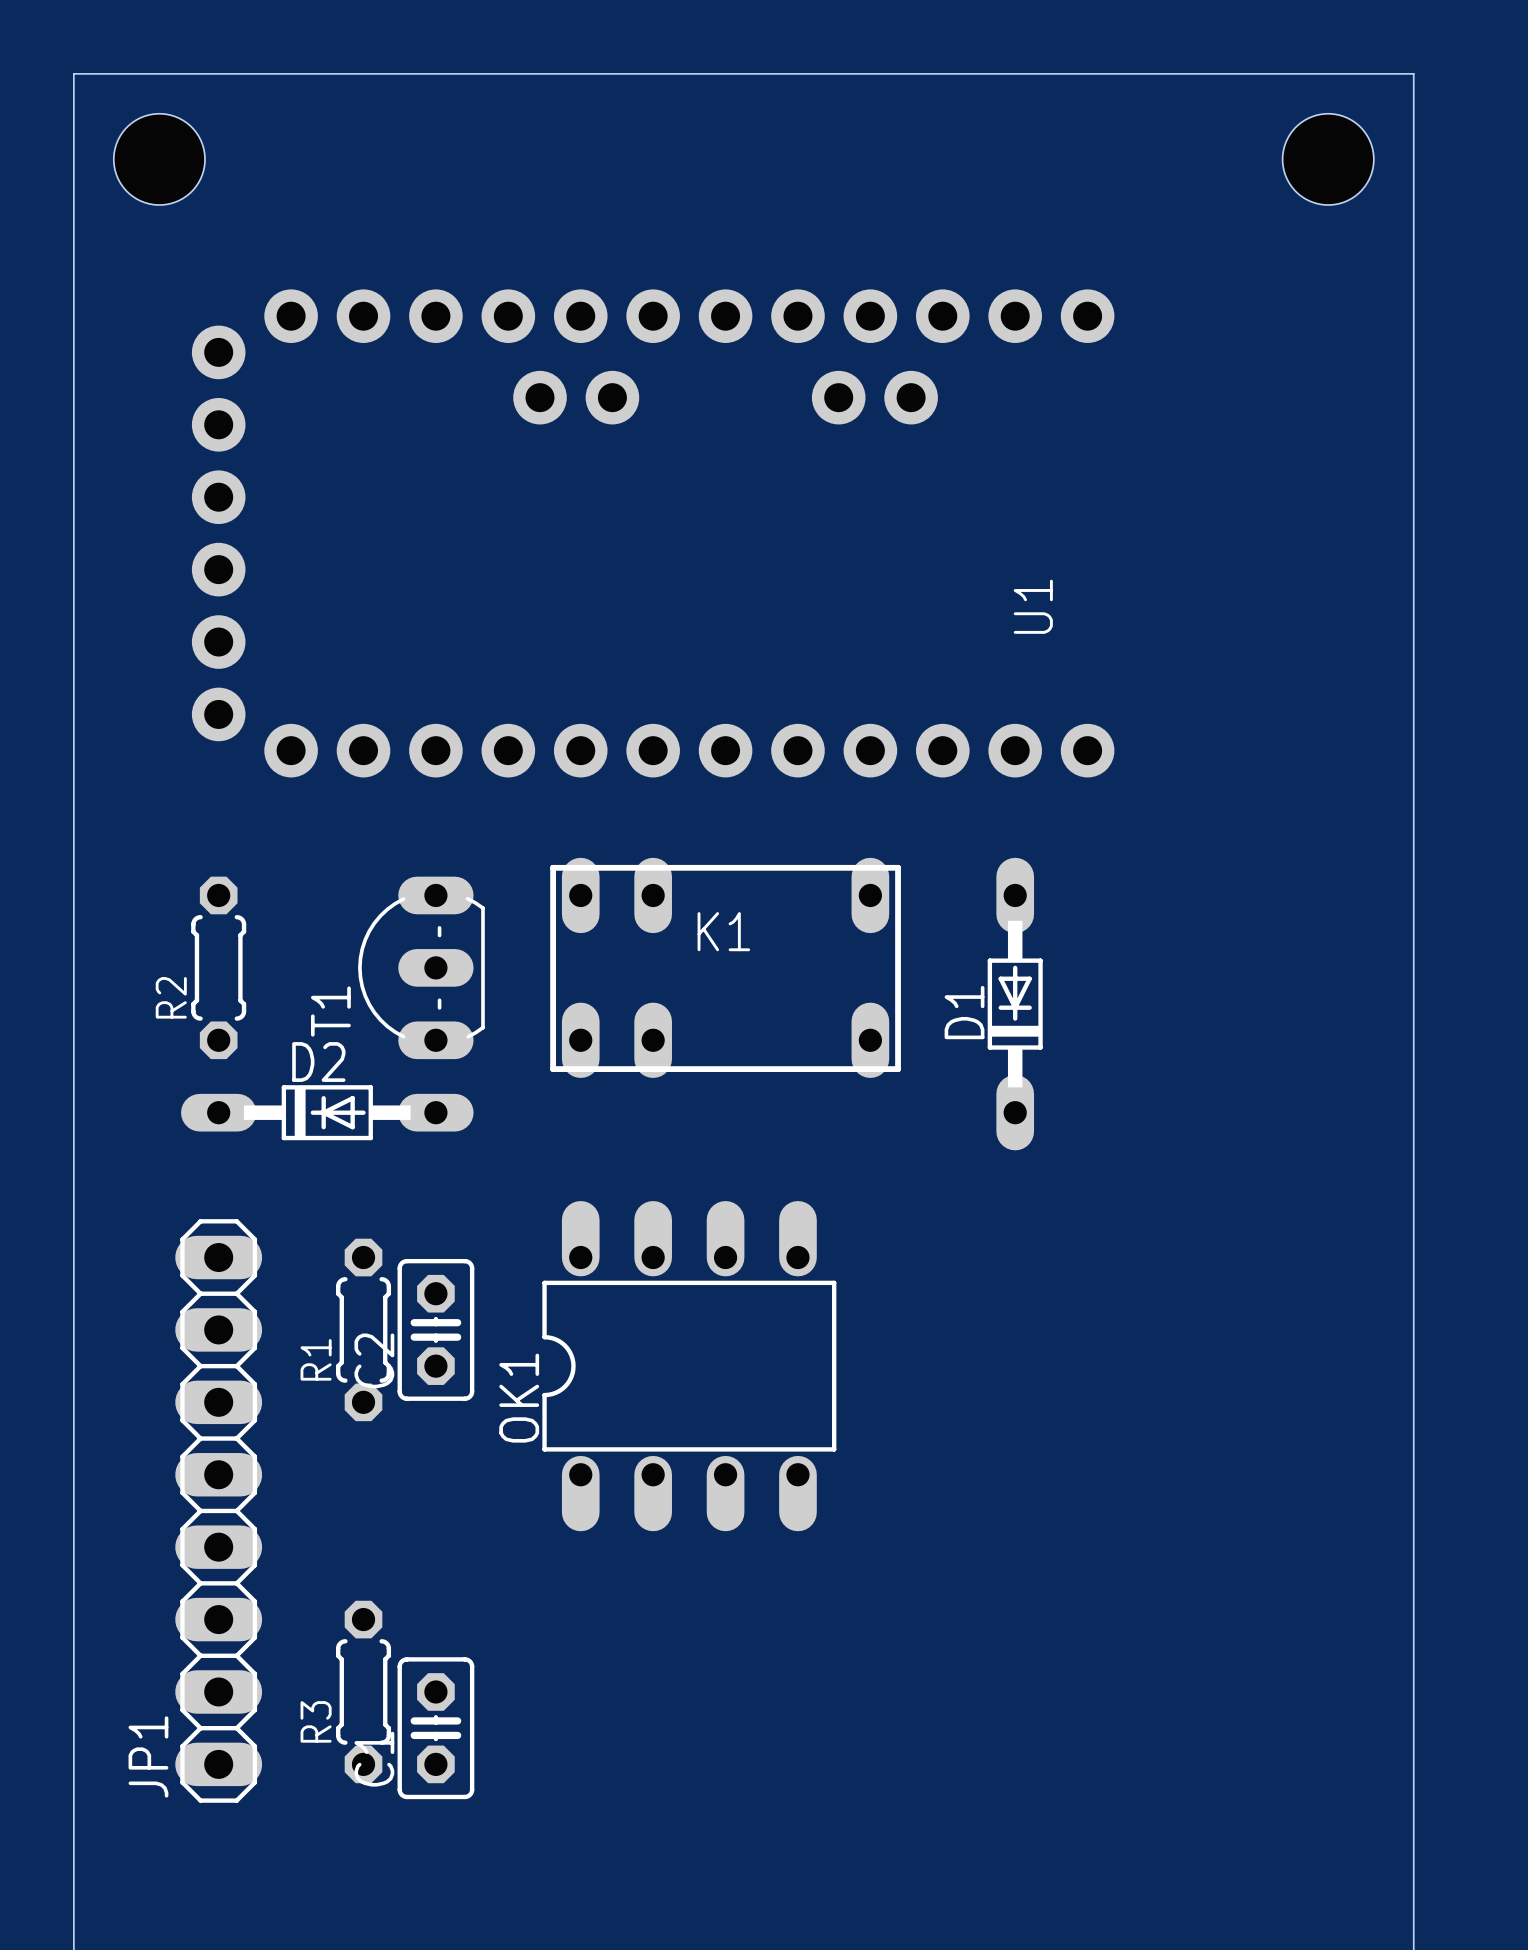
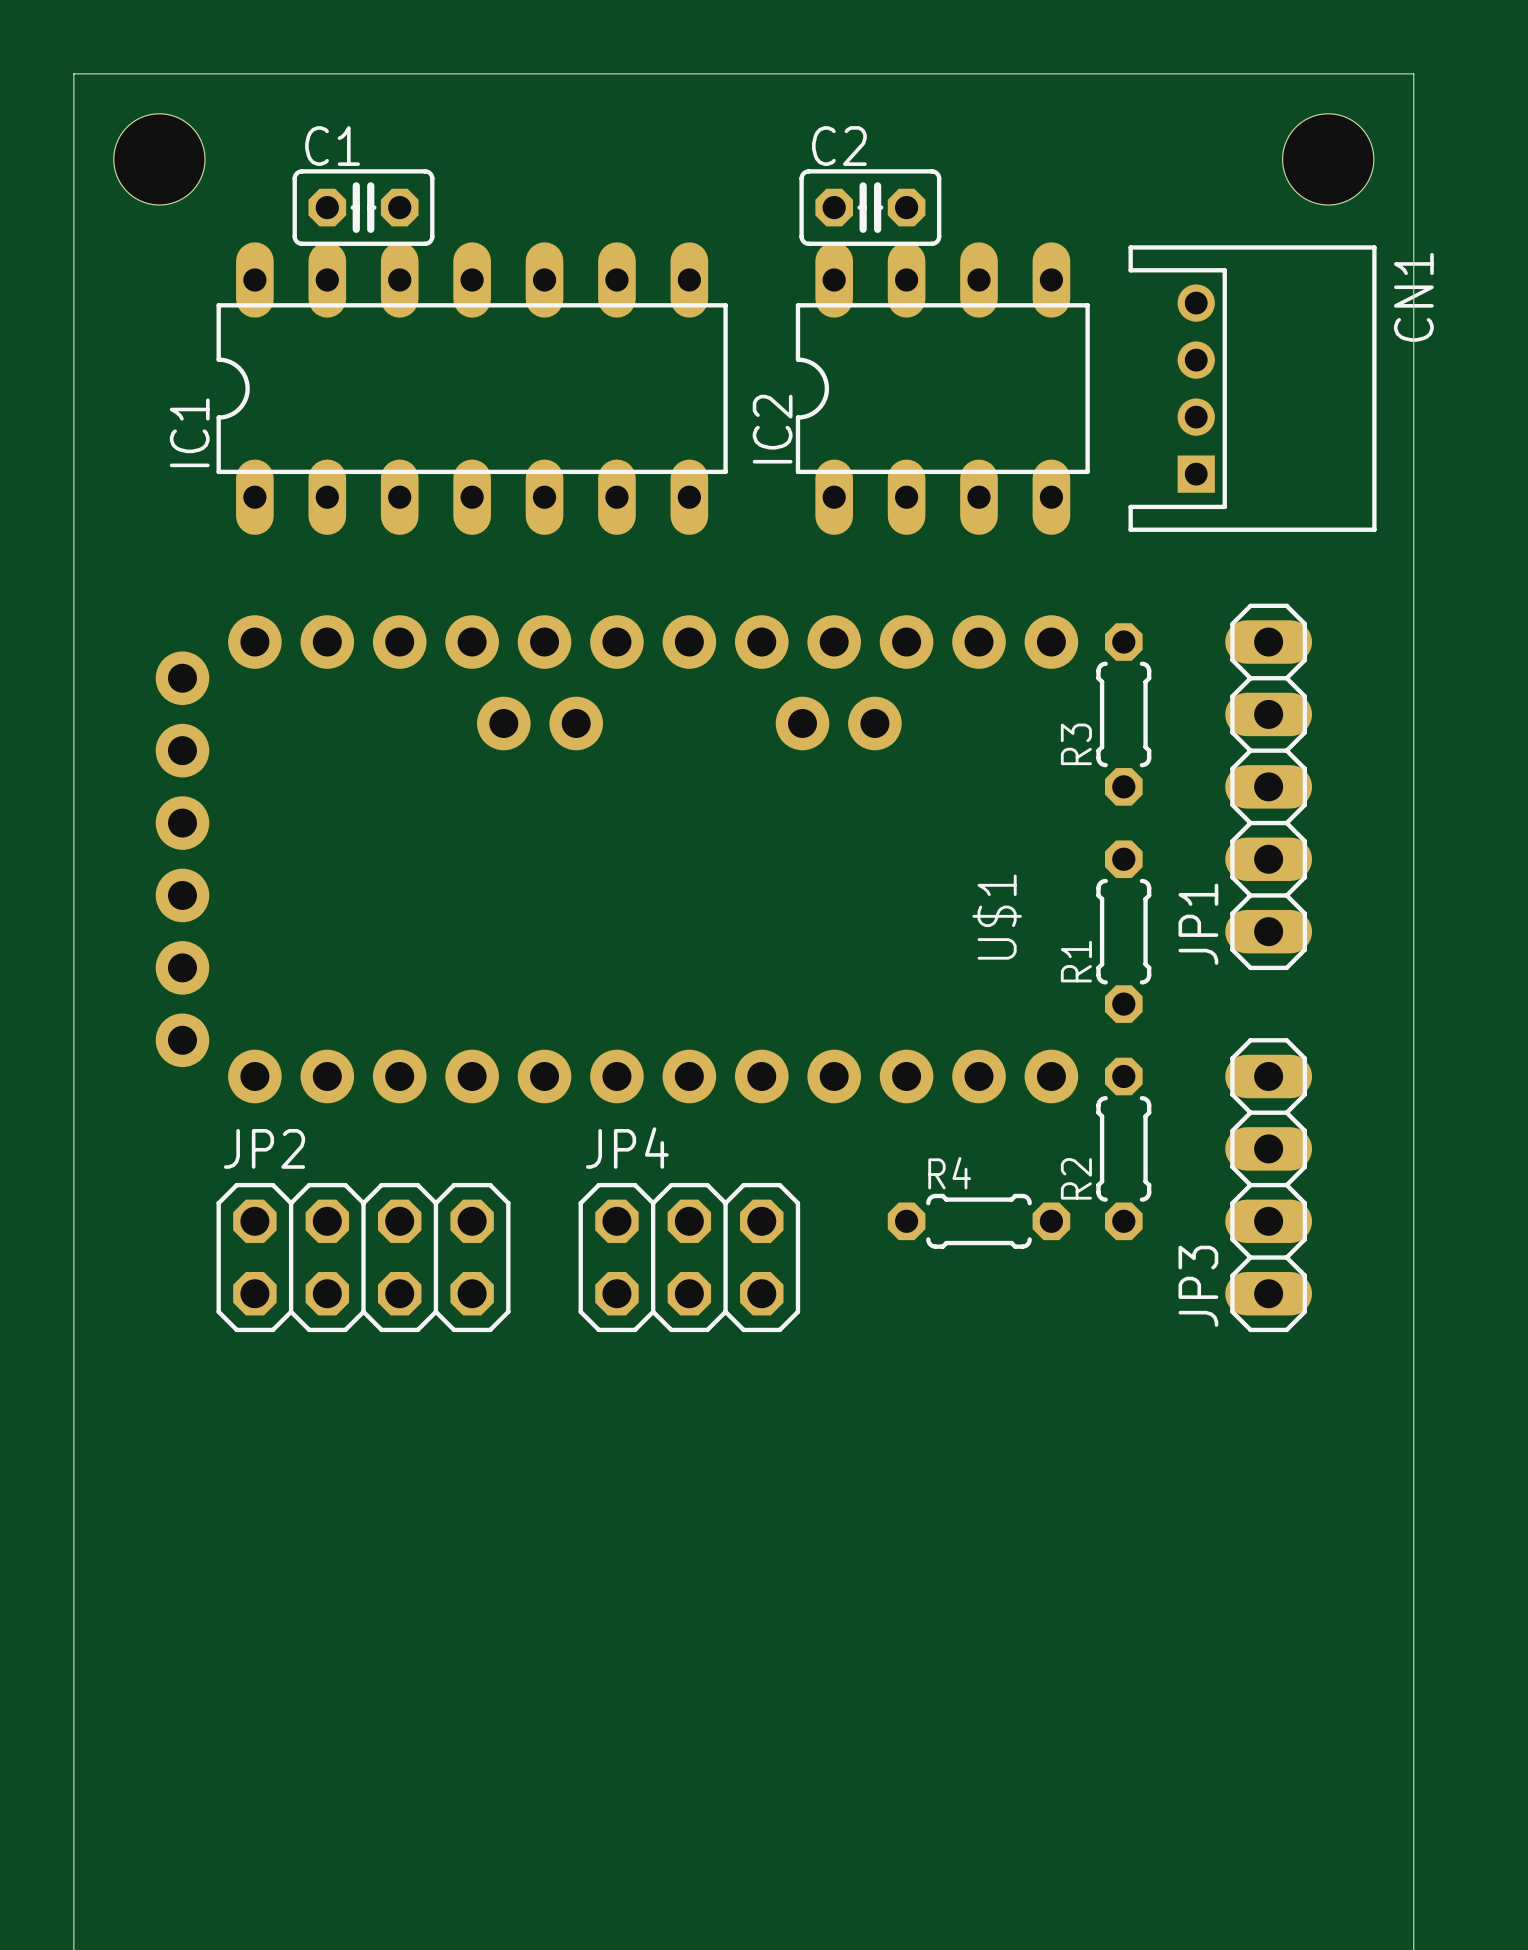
IC1: none -> (472, 388)
IC2: none -> (942, 388)
CN1: none -> (1252, 388)
U1: (653, 533) -> none
U$1: none -> (616, 859)
R2 position: (218, 967) -> (1123, 1148)
T1: (421, 967) -> none
K1: (725, 967) -> none
D1: (1015, 1004) -> none
D2: (327, 1112) -> none
JP3: none -> (1268, 1185)
JP1 footprint: [175, 1219, 263, 1803] -> [1225, 603, 1313, 971]
R4: none -> (979, 1221)
JP2: none -> (363, 1257)
JP4: none -> (689, 1257)
R1 position: (363, 1329) -> (1123, 931)
C2 rotation: 0° (435, 1329) -> 90° clockwise (870, 207)
C2 position: (435, 1329) -> (870, 207)
OK1: (689, 1366) -> none
R3 position: (363, 1691) -> (1123, 714)
C1 rotation: 0° (435, 1728) -> 90° clockwise (363, 207)
C1 position: (435, 1728) -> (363, 207)
JP1 name position: JP1 (148, 1756) -> JP1 (1198, 924)

